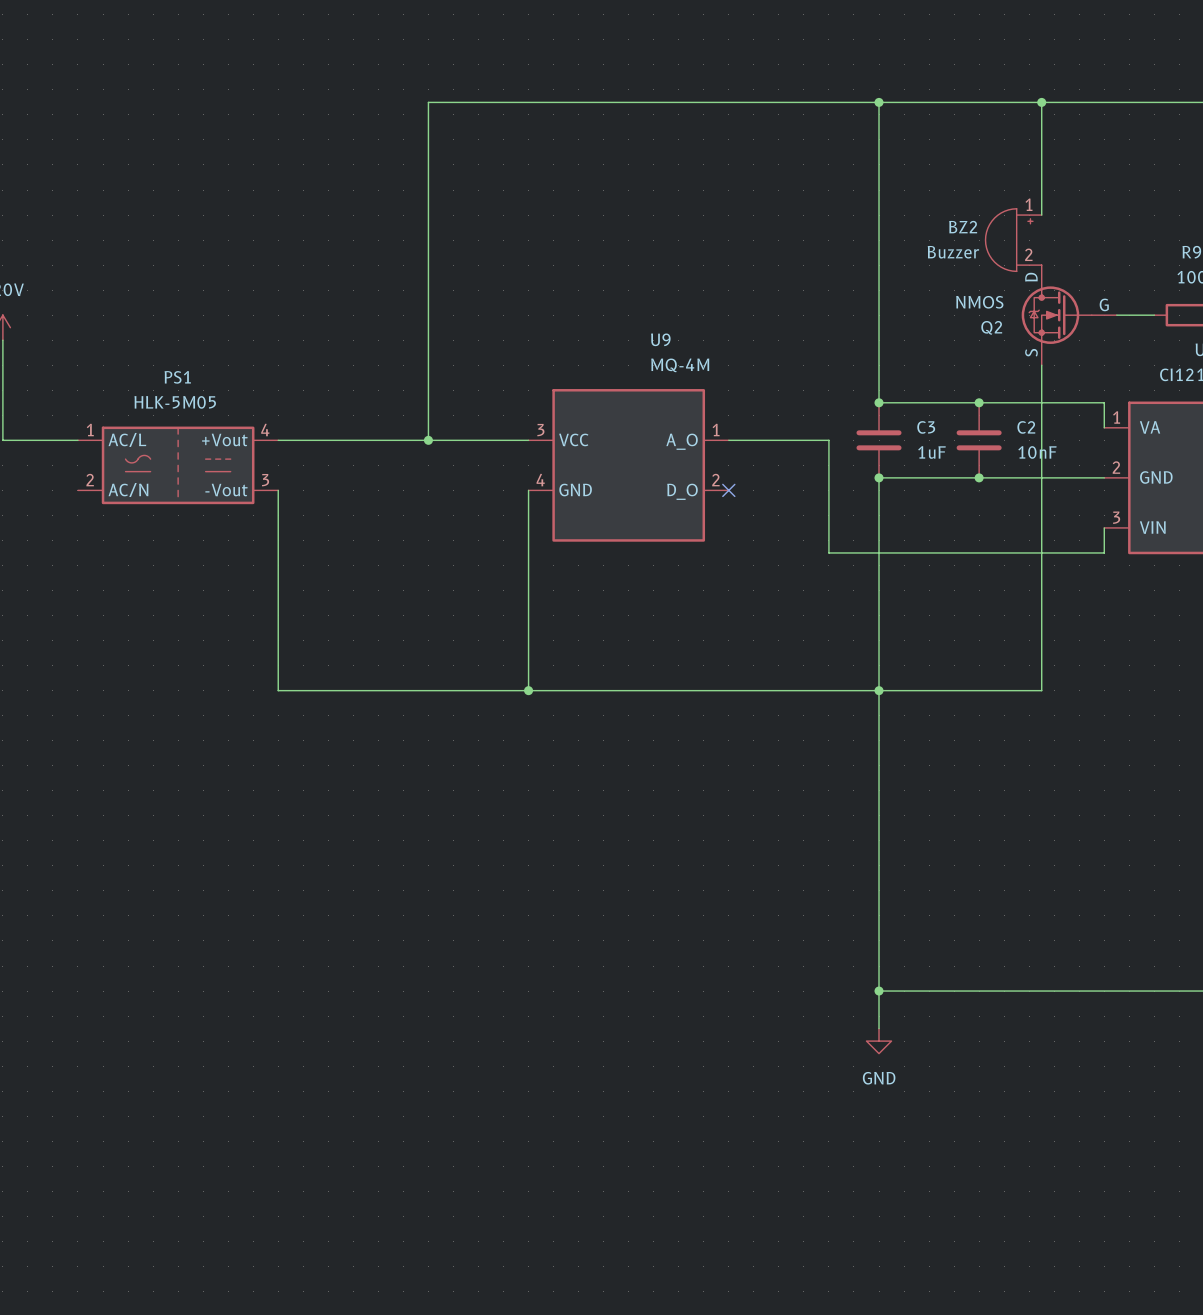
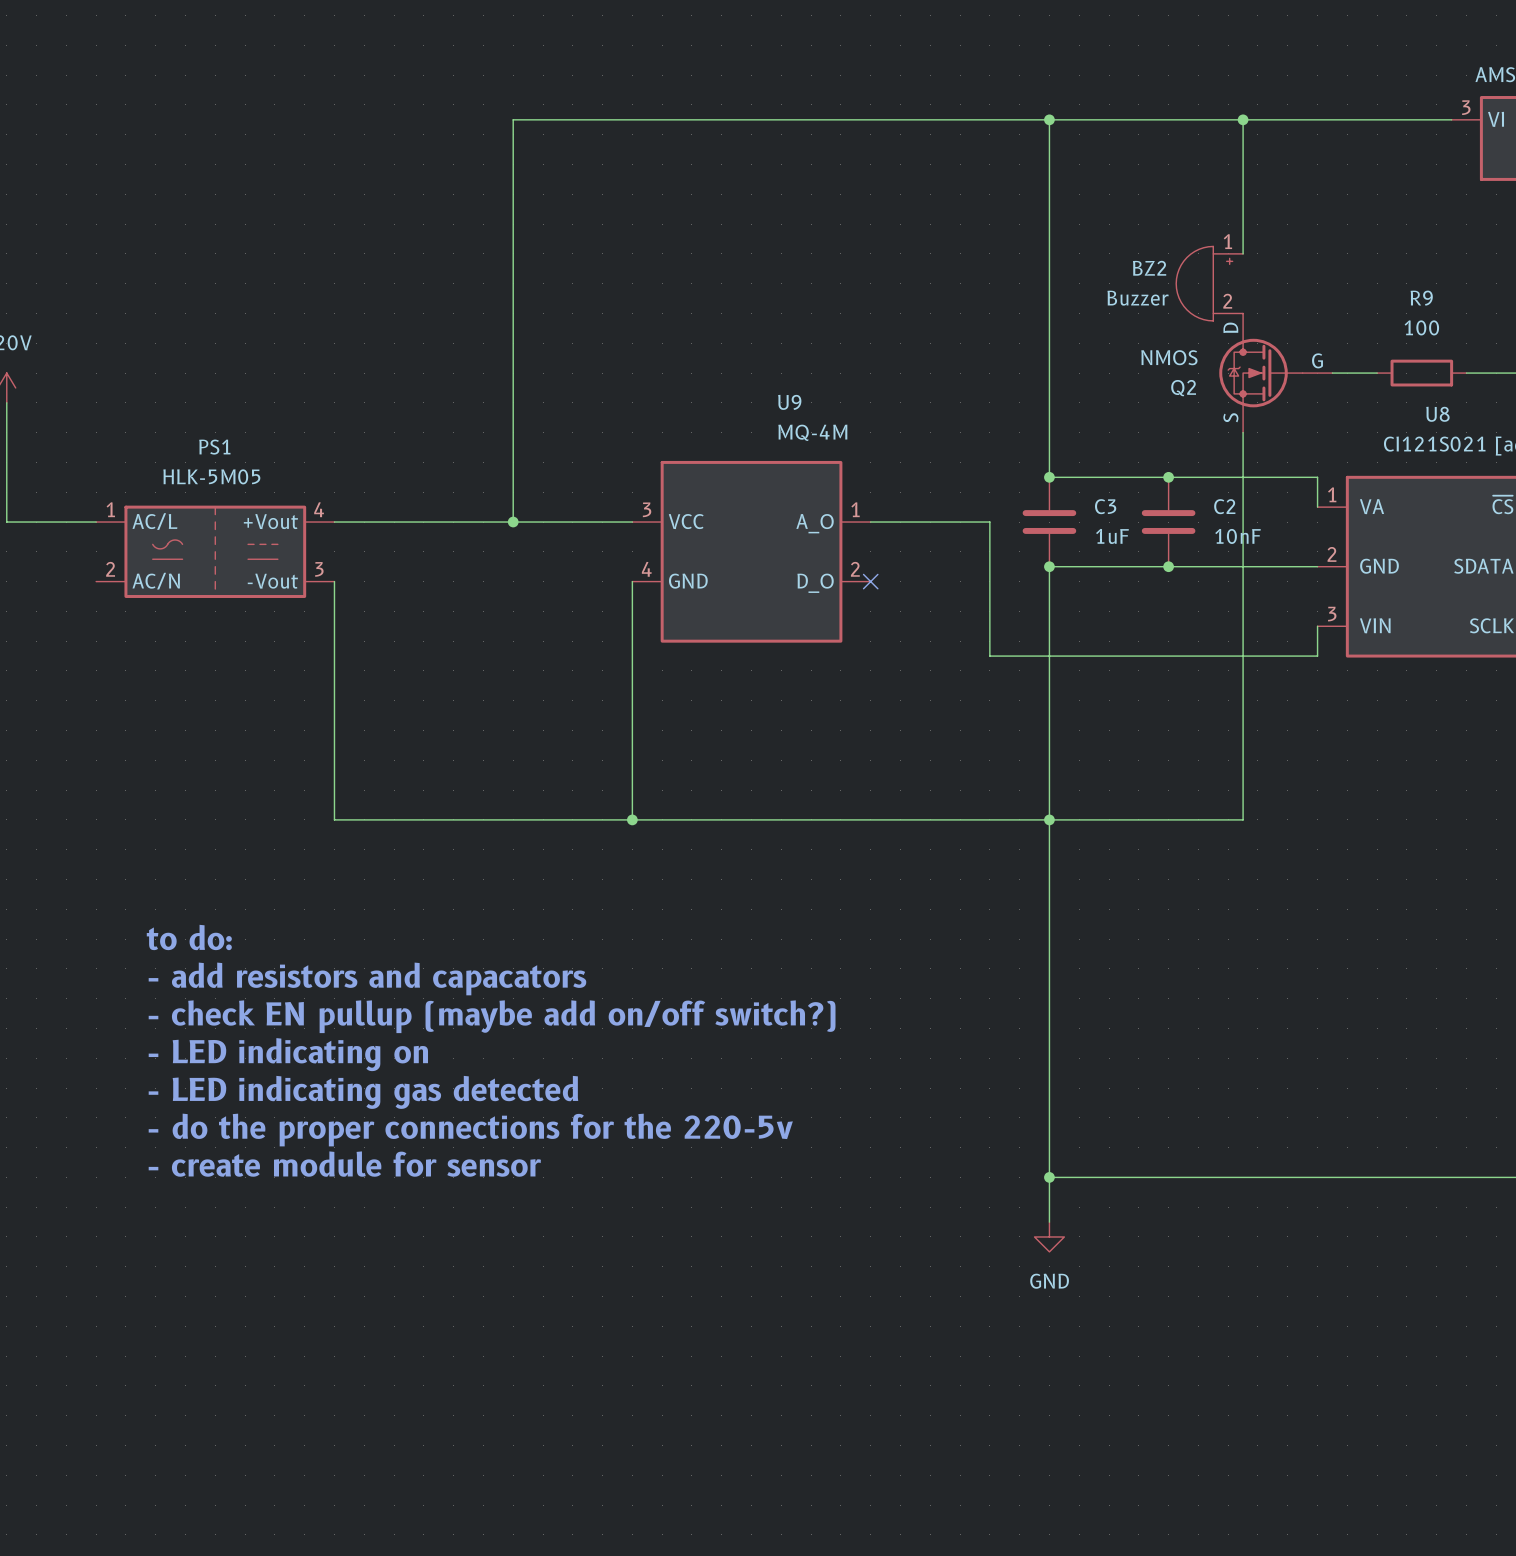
text: none -> to do: (189, 937)
text: none -> - add resistors and capacators (367, 978)
text: none -> - check EN pullup (maybe add on/off switch?) (492, 1016)
text: none -> - LED indicating on (288, 1054)
text: none -> - LED indicating gas detected (363, 1092)
text: none -> - do the proper connections for the 220-5v (470, 1130)
text: none -> - create module for sensor (344, 1164)

